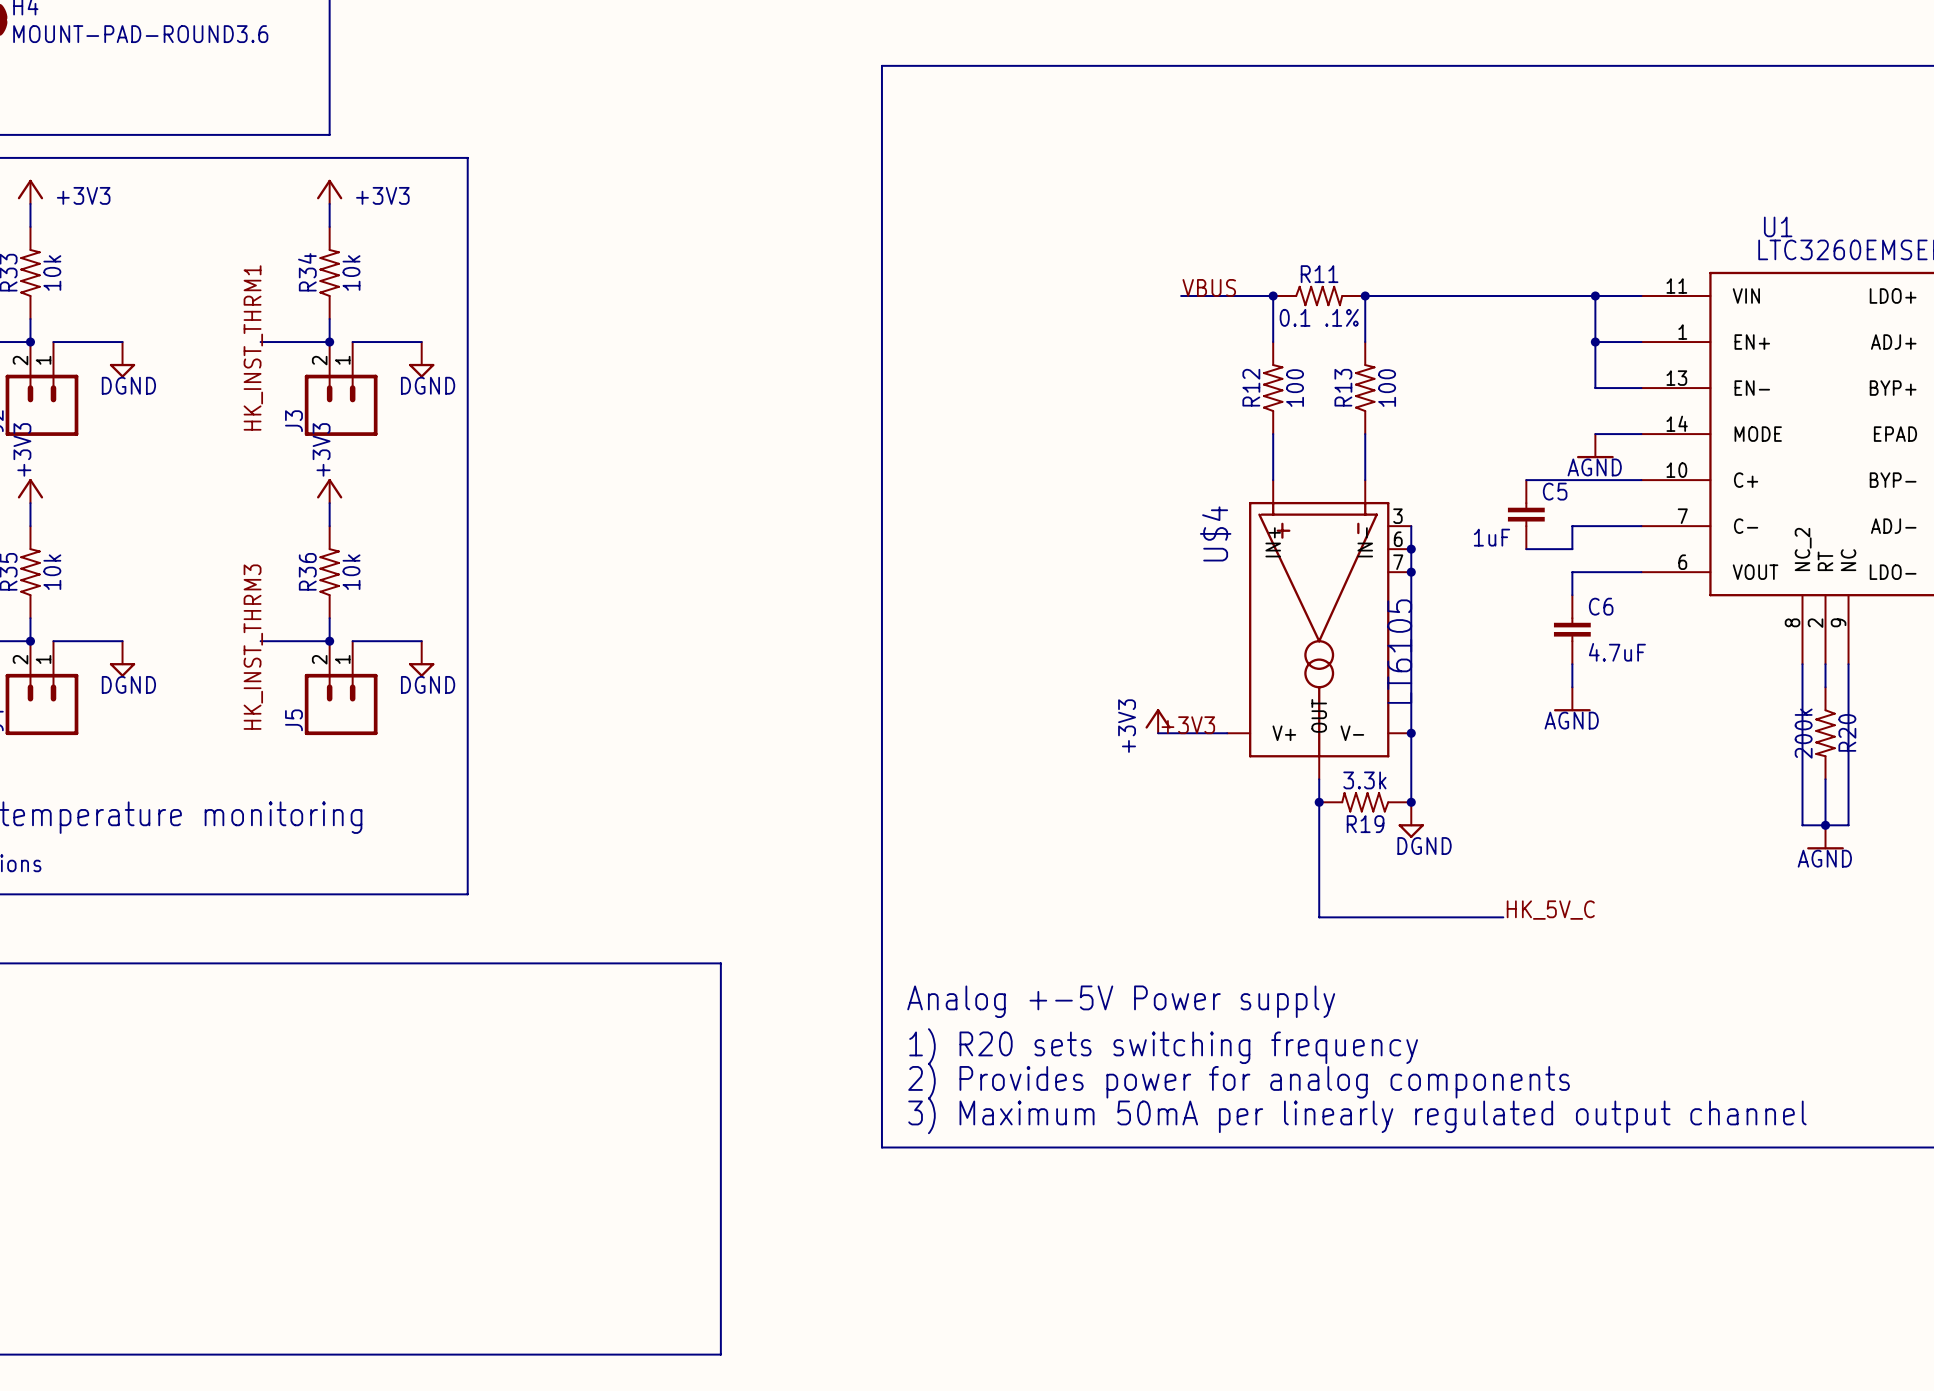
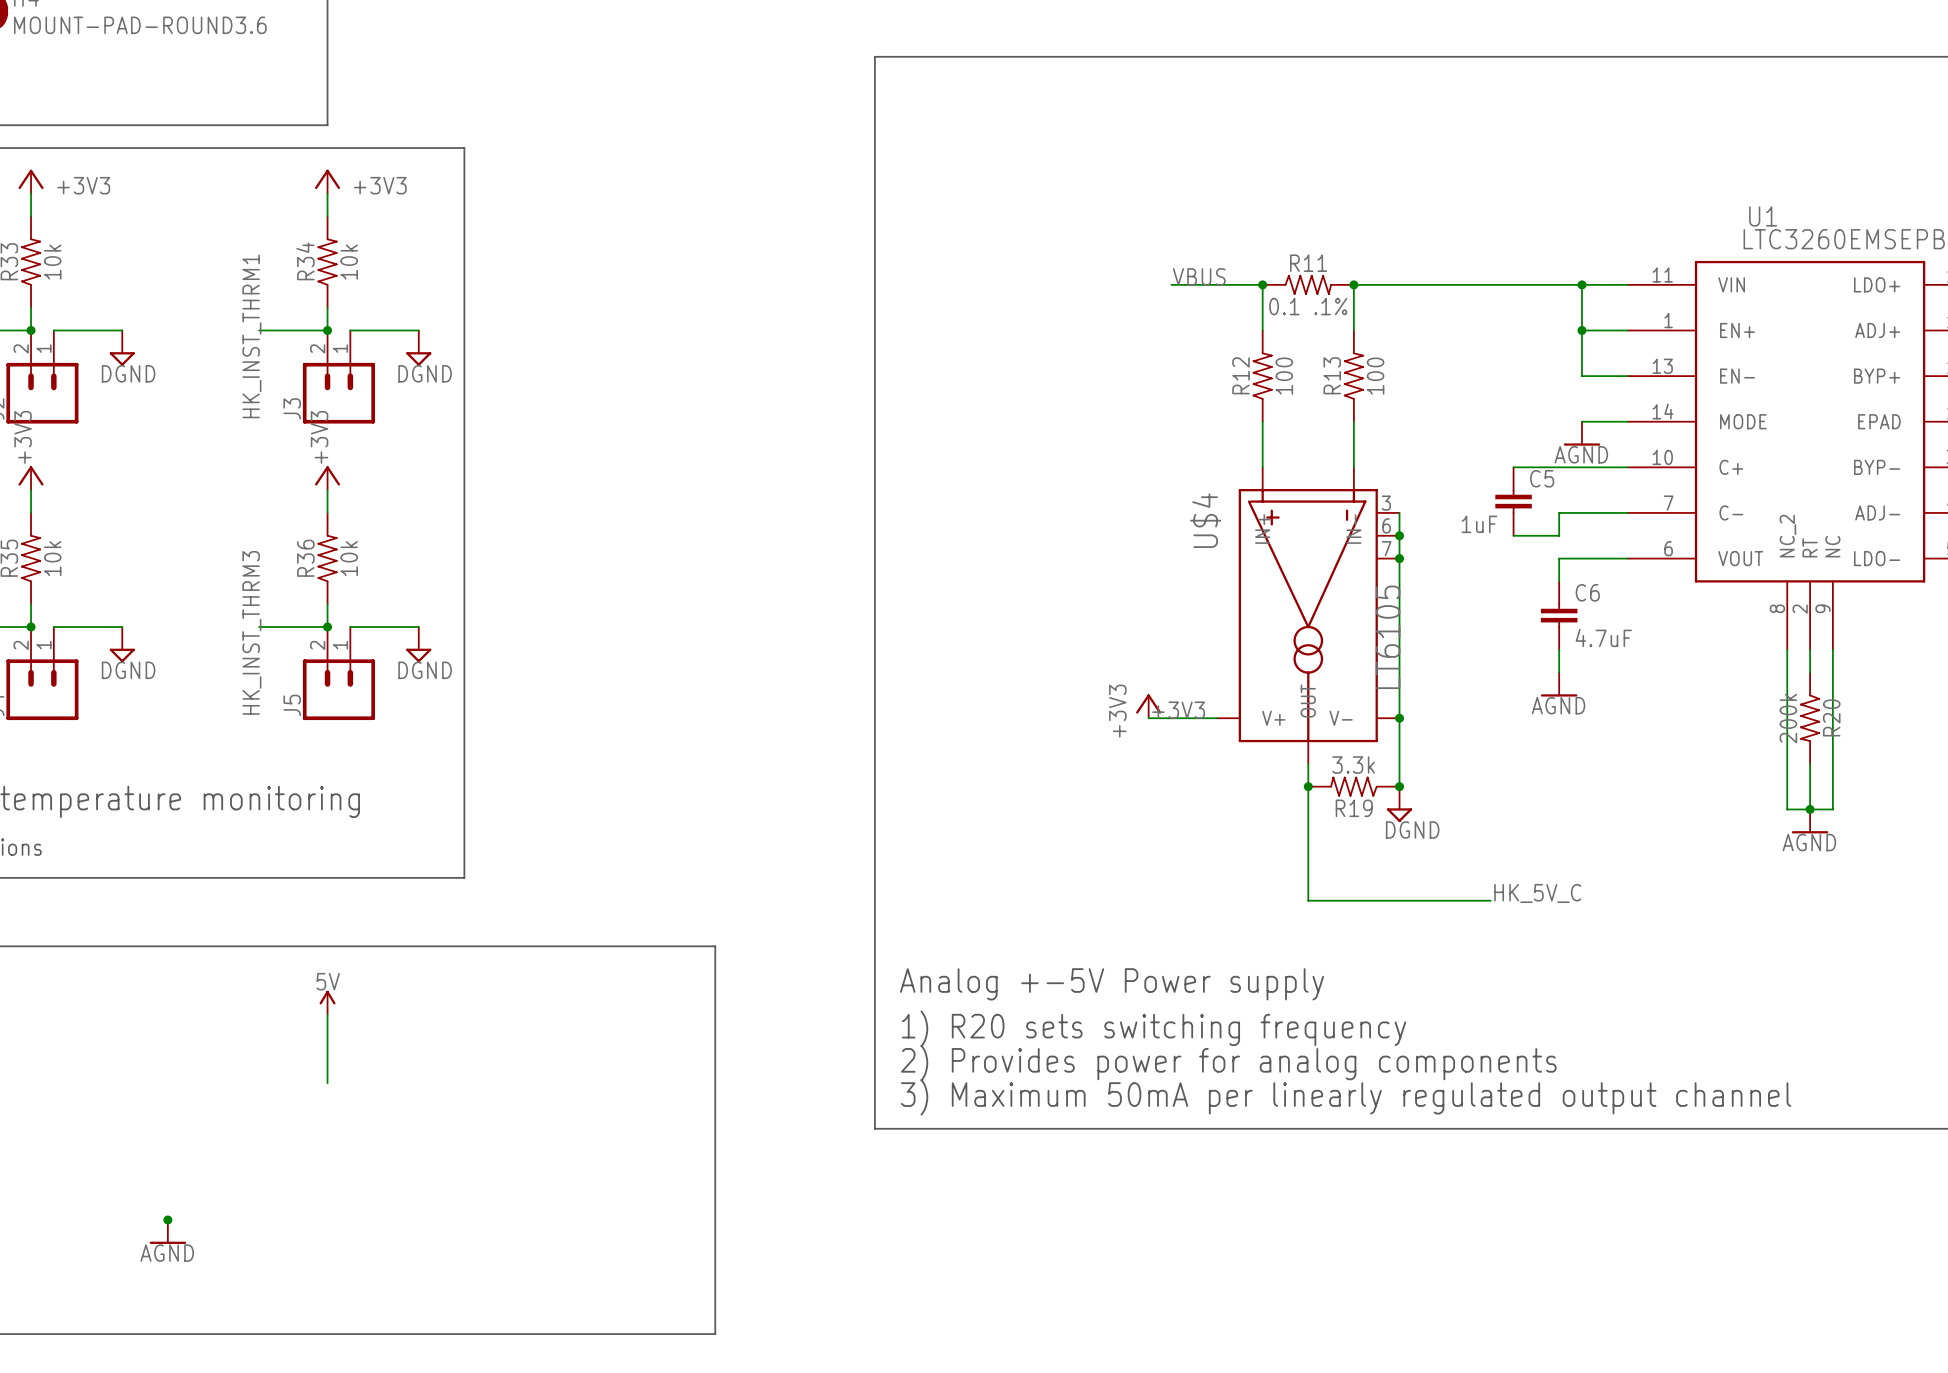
power symbol: none -> 5V (327, 1002)
wire: none -> (327, 1014) (327, 1083)
junction: none -> (167, 1220)
power symbol: none -> AGND (167, 1231)

